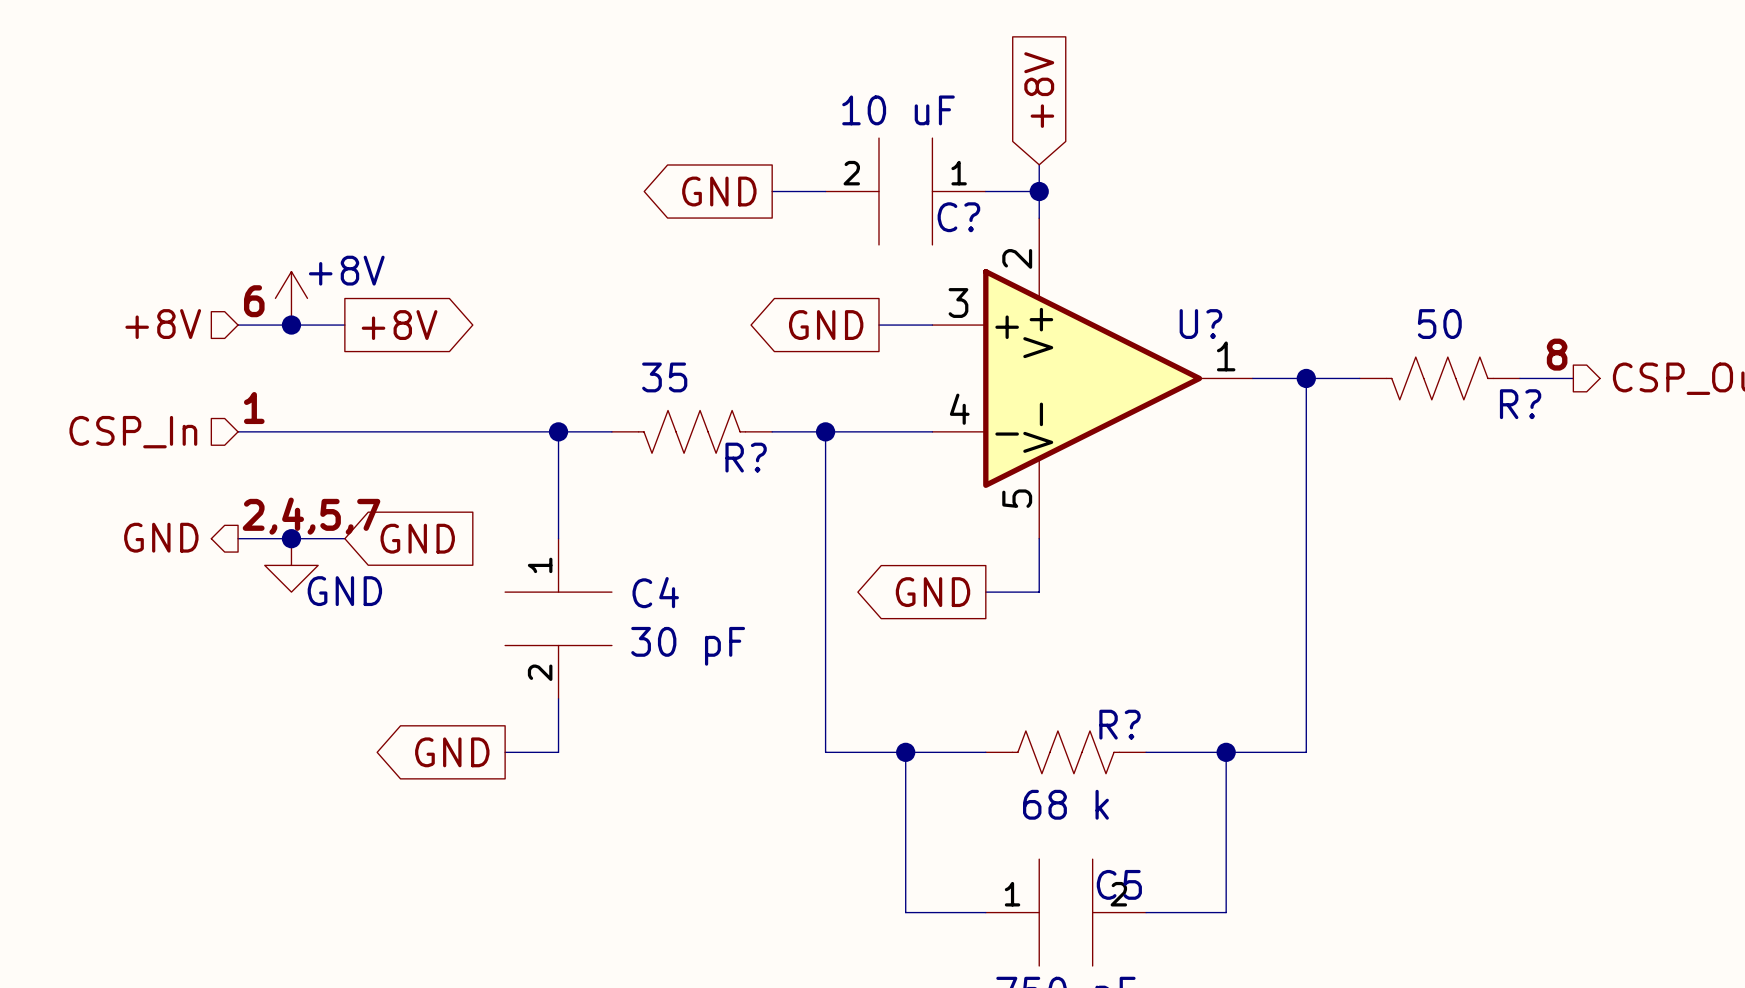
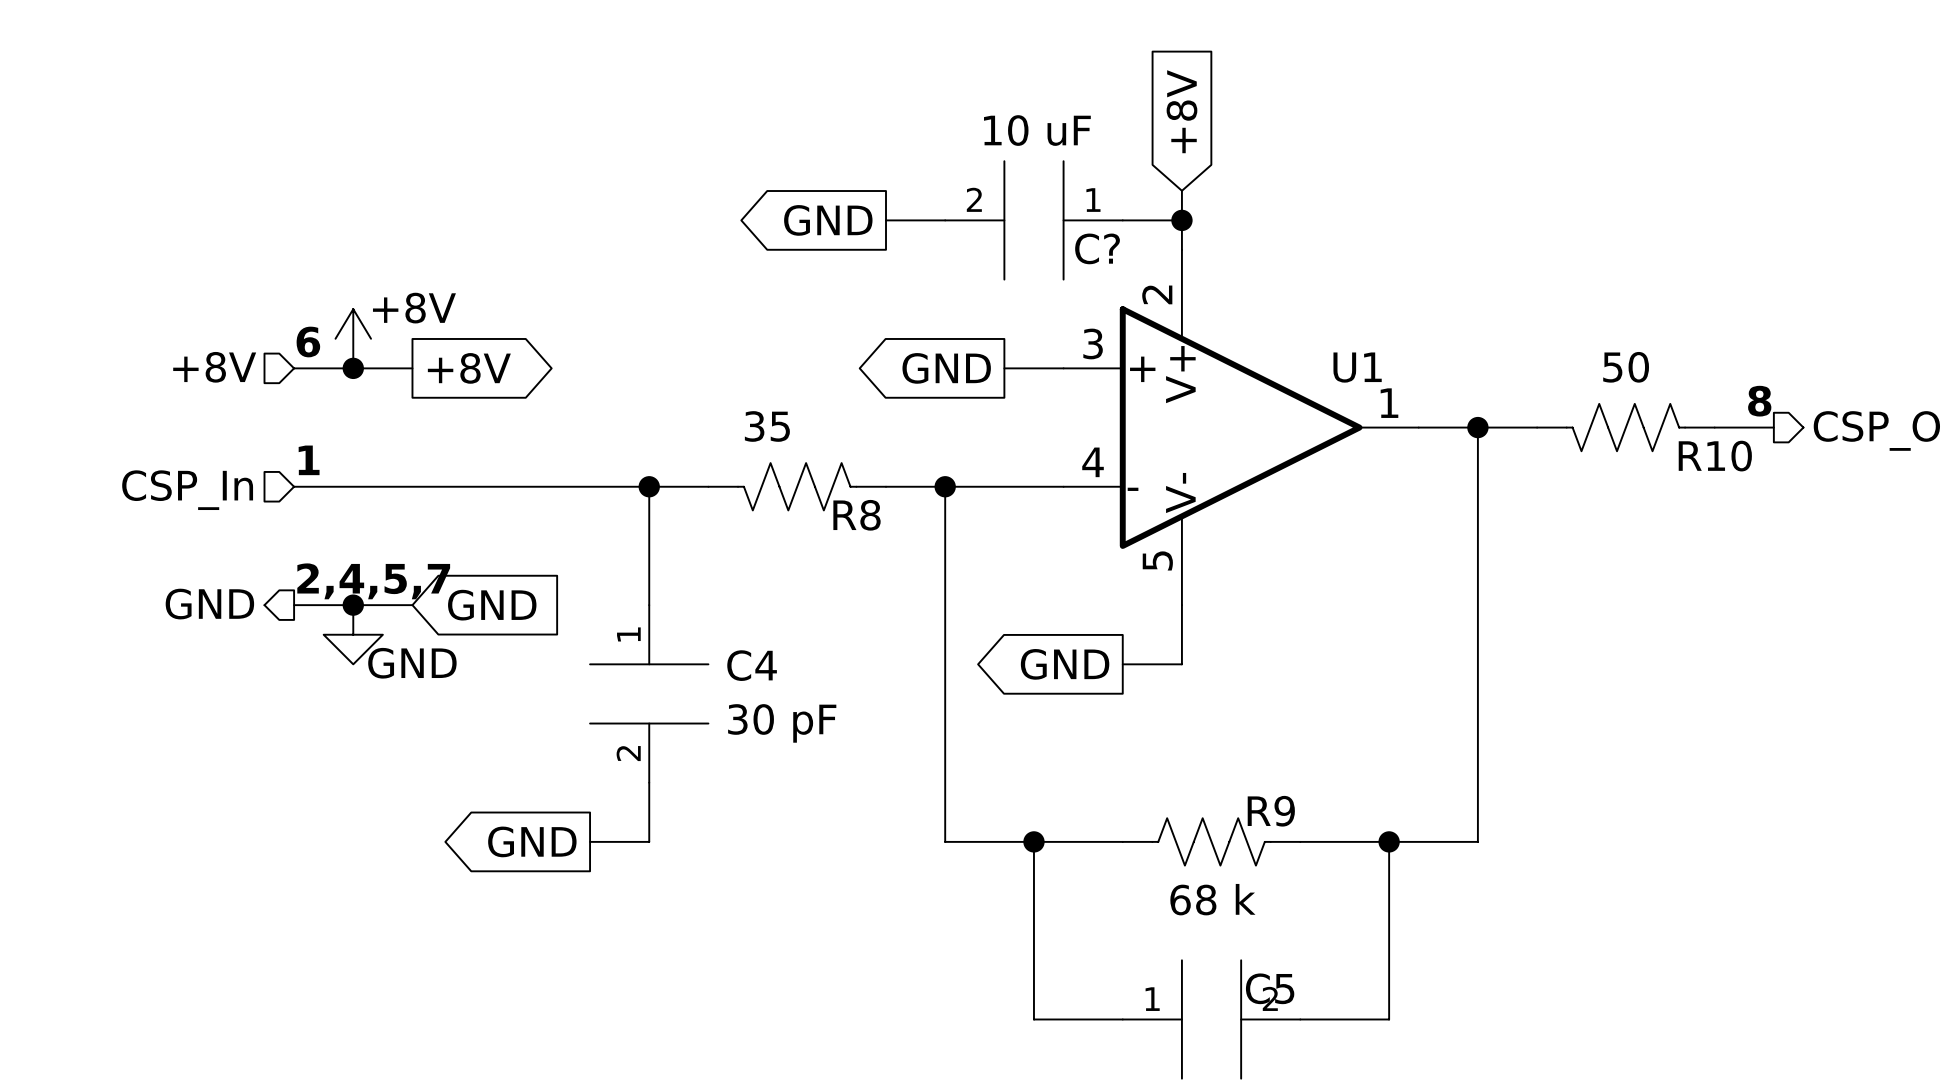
U? name: U? (1200, 324) -> U1 (1357, 367)
R? name: R? (1520, 404) -> R10 (1715, 456)
R? name: R? (746, 457) -> R8 (857, 515)
R? name: R? (1119, 724) -> R9 (1271, 811)

